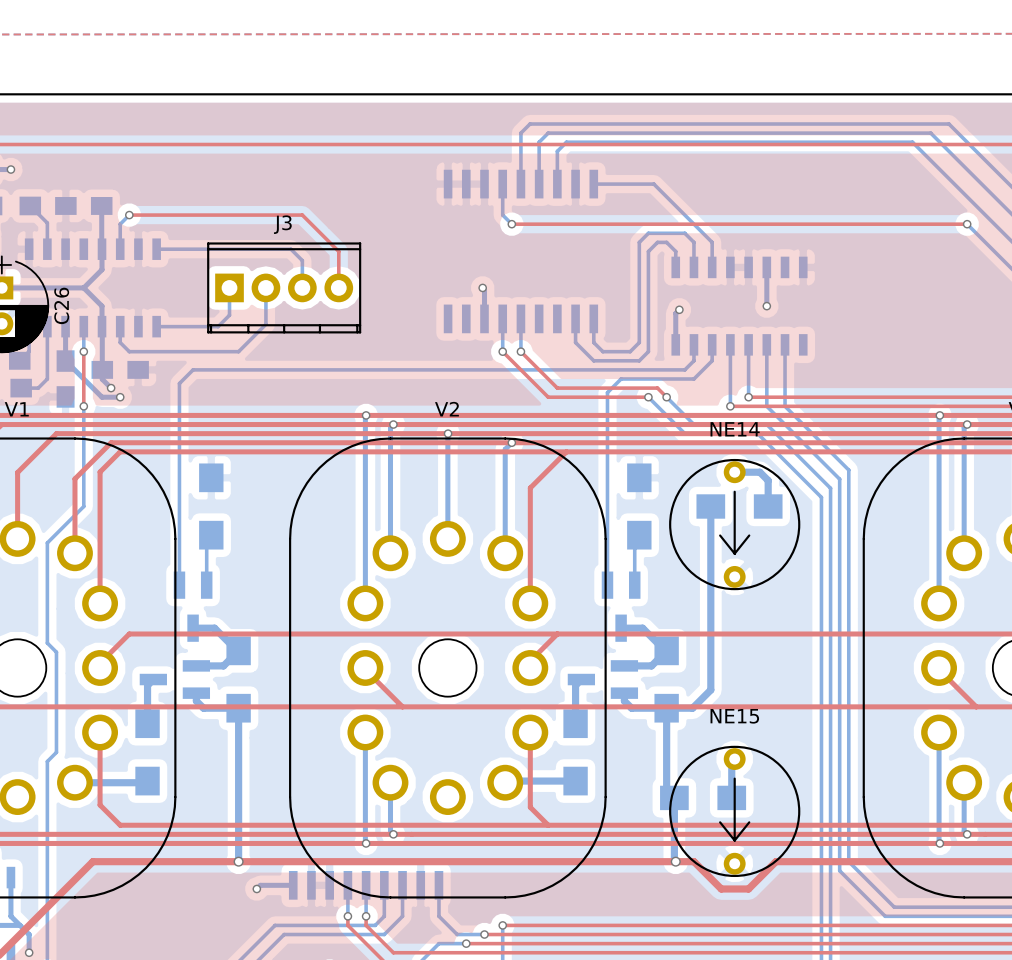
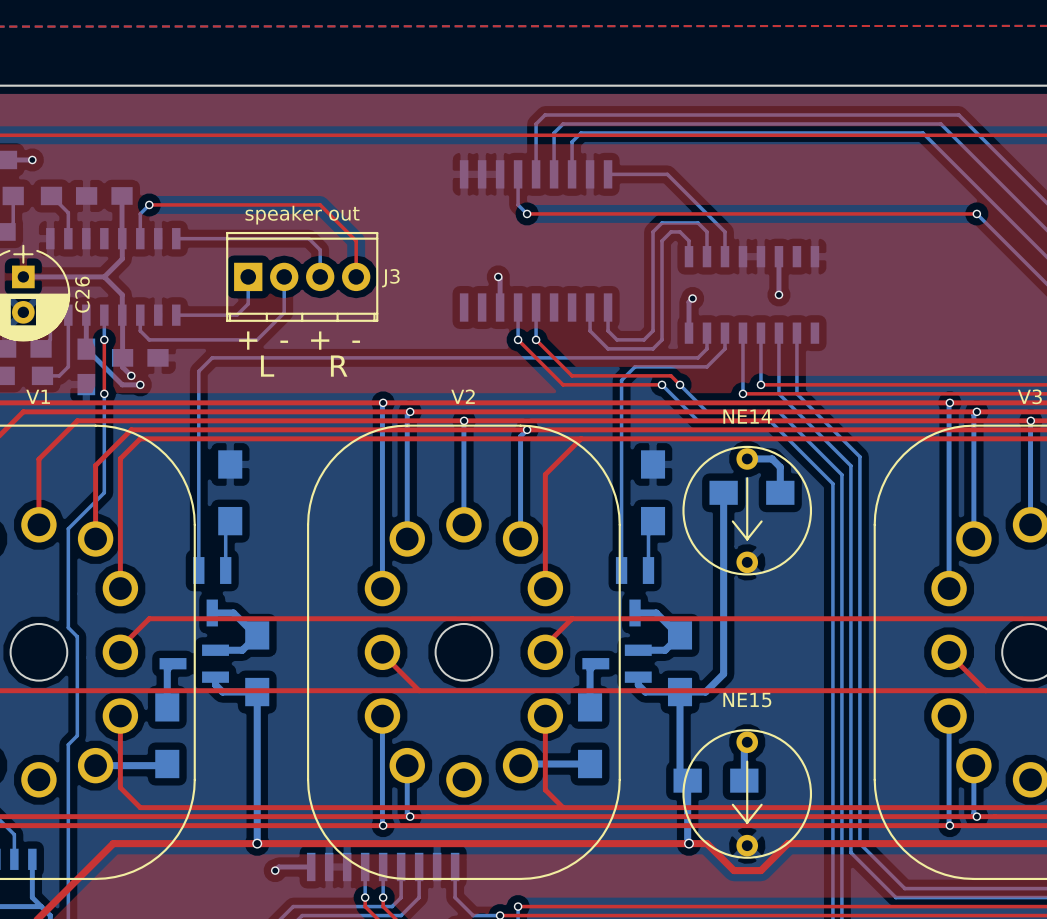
J3 name position: J3 (282, 224) -> J3 (390, 278)
text: none -> speaker out (302, 215)
text: none -> + (248, 340)
text: none -> + (320, 340)
text: none -> - (284, 341)
text: none -> - (356, 341)
text: none -> L (267, 366)
text: none -> R (339, 366)

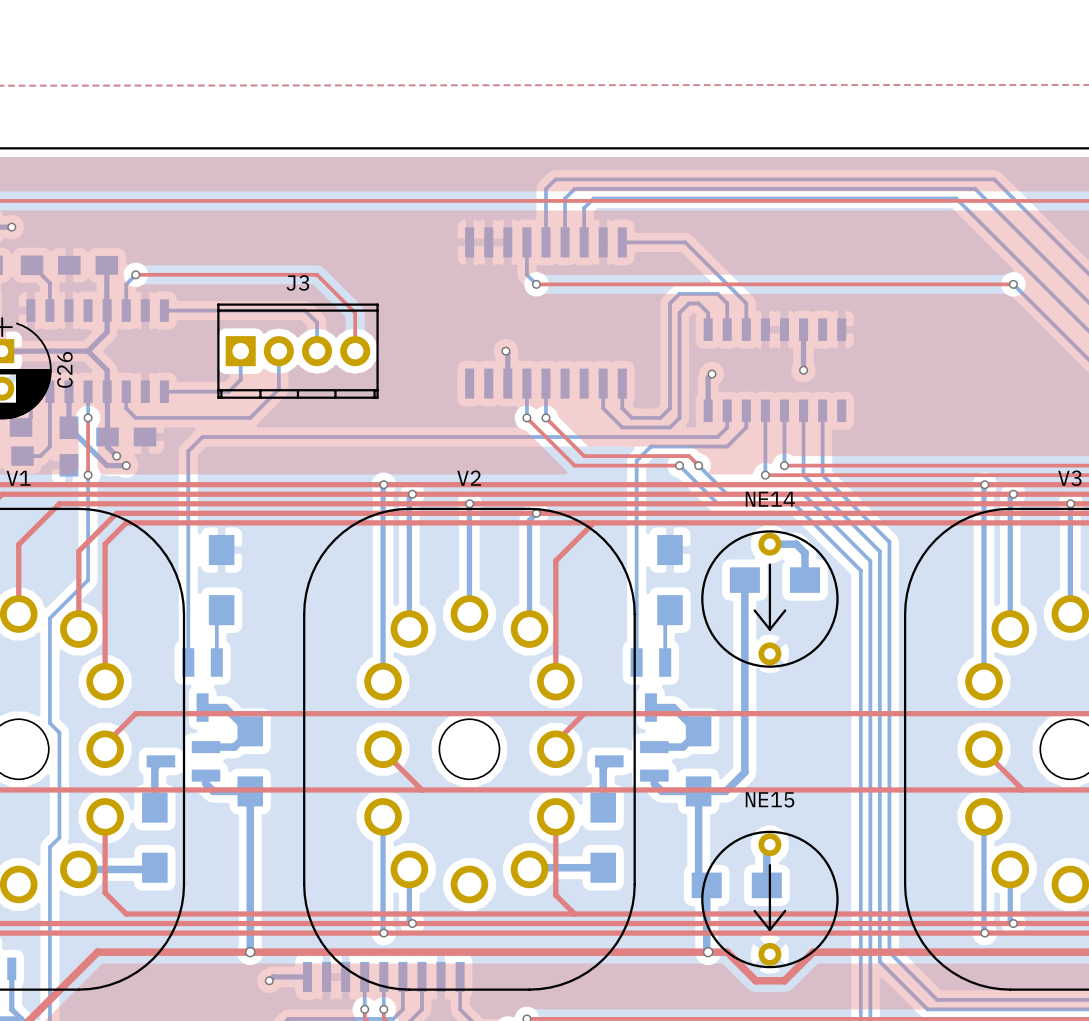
text: speaker out (302, 215) -> none
J3 name position: J3 (390, 278) -> J3 (297, 282)
text: + (248, 340) -> none
text: + (320, 340) -> none
text: - (284, 341) -> none
text: - (356, 341) -> none
text: L (267, 366) -> none
text: R (339, 366) -> none

